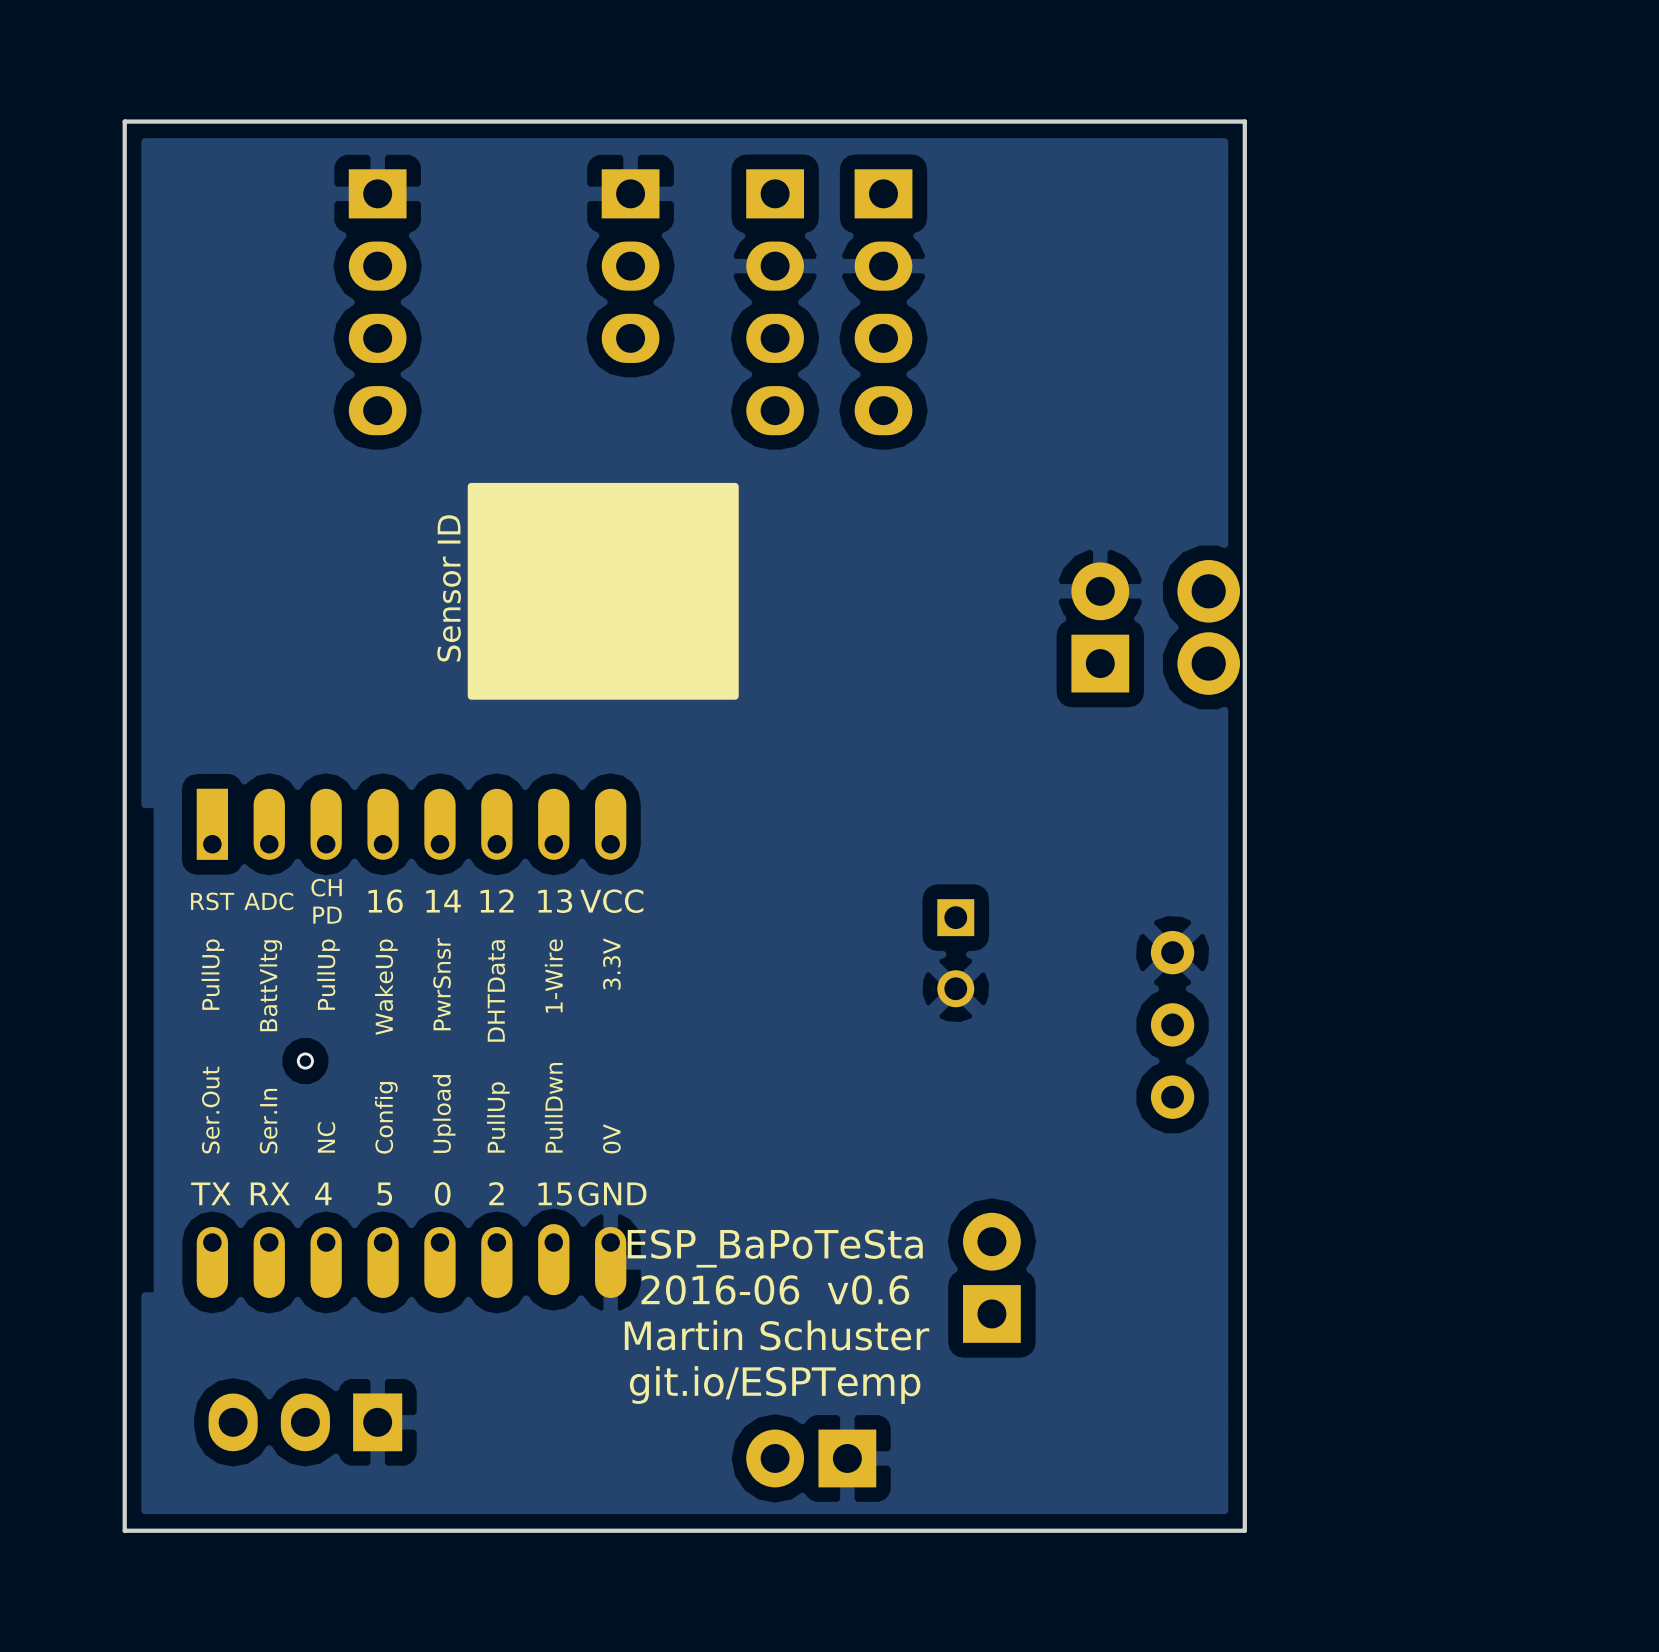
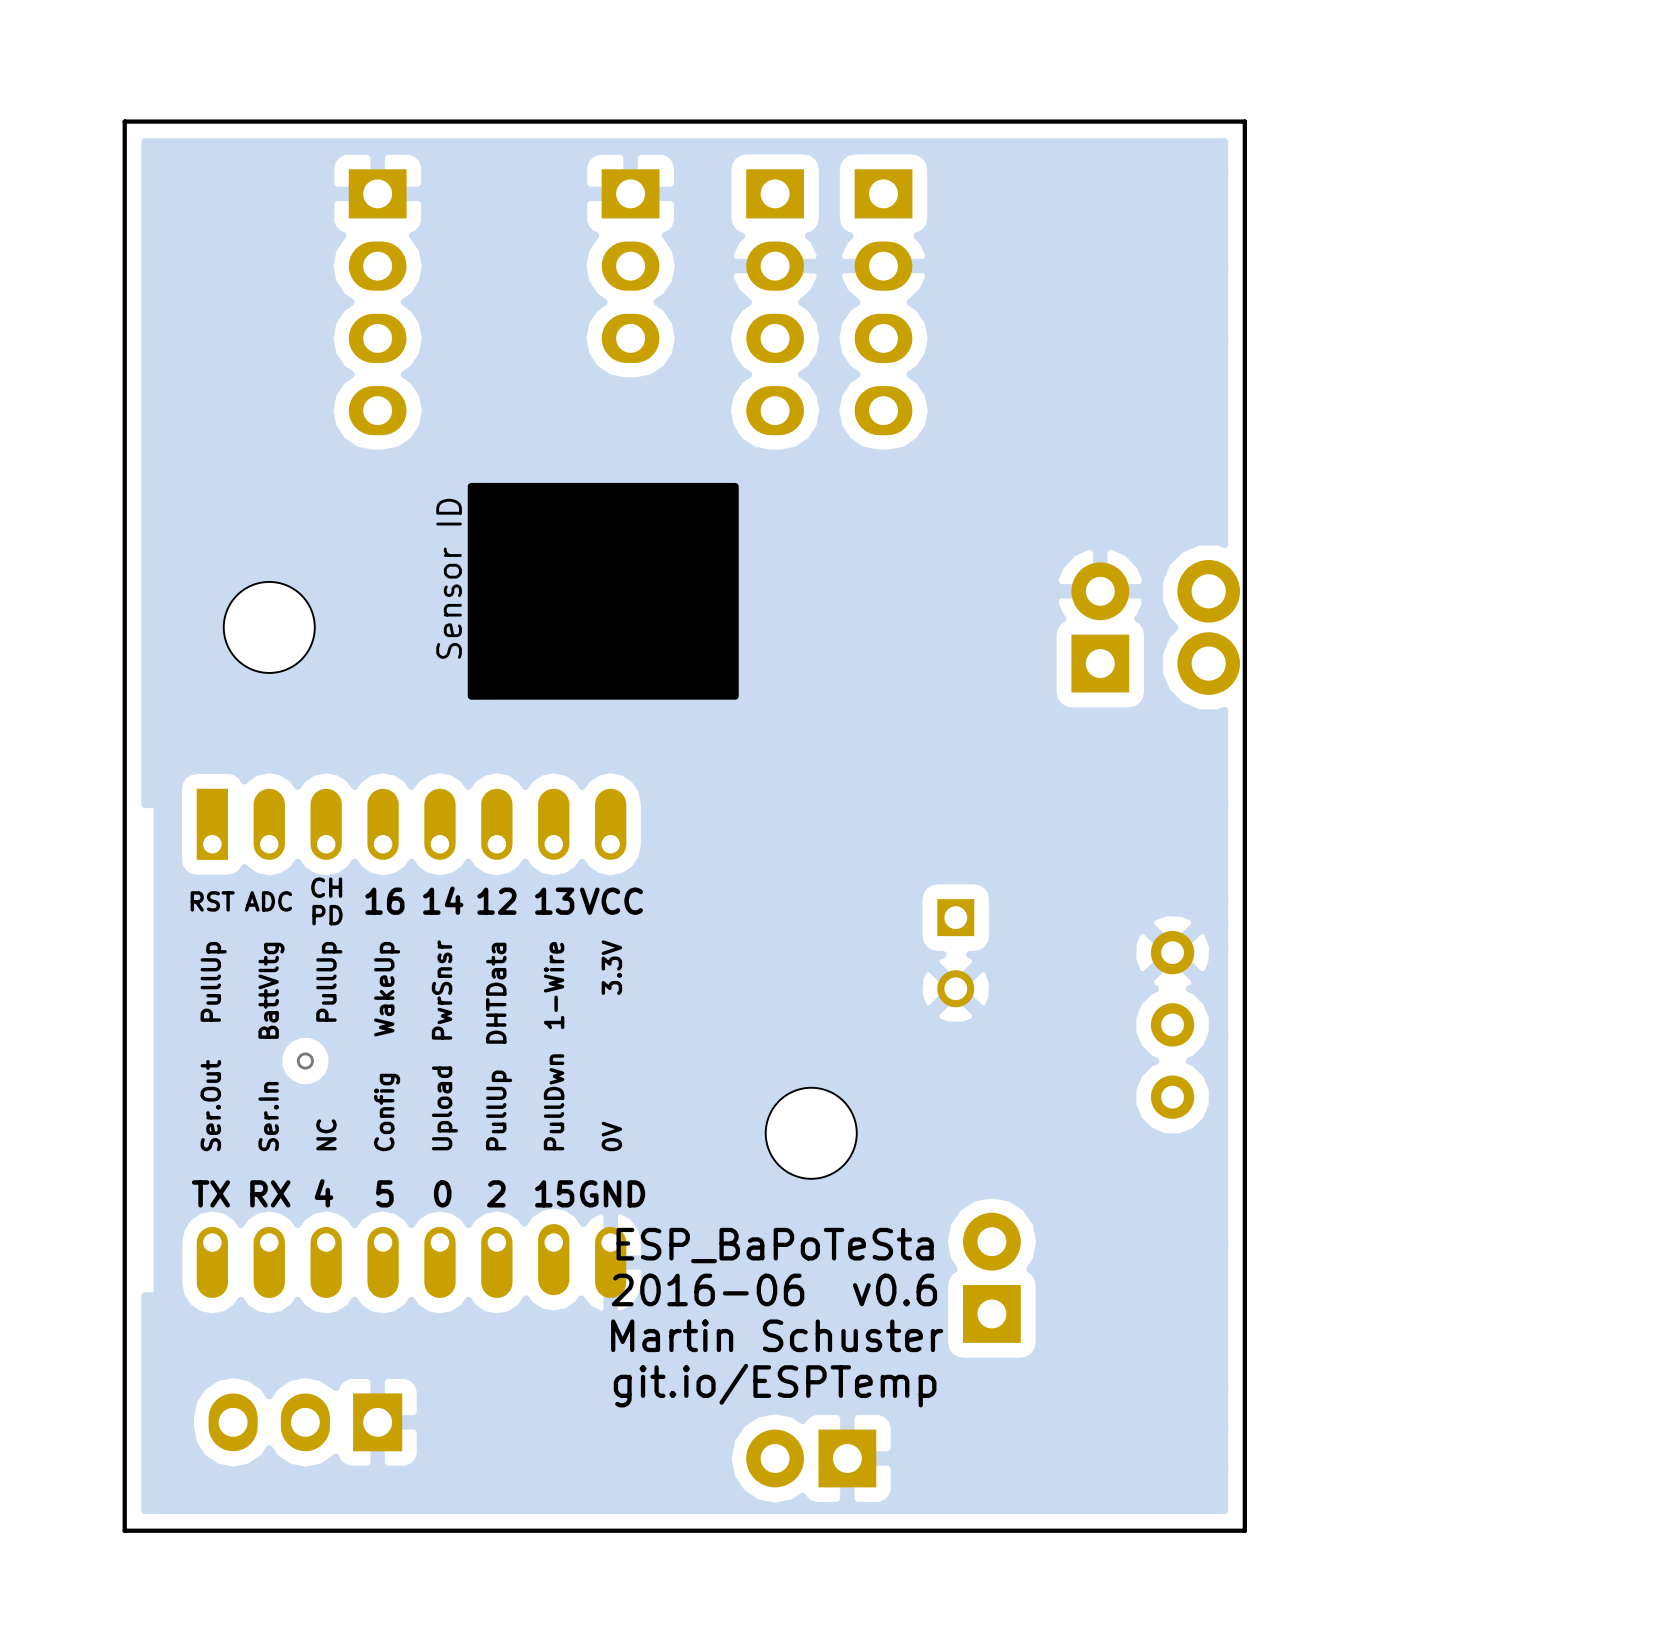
part: none -> (269, 627)
part: none -> (811, 1133)

